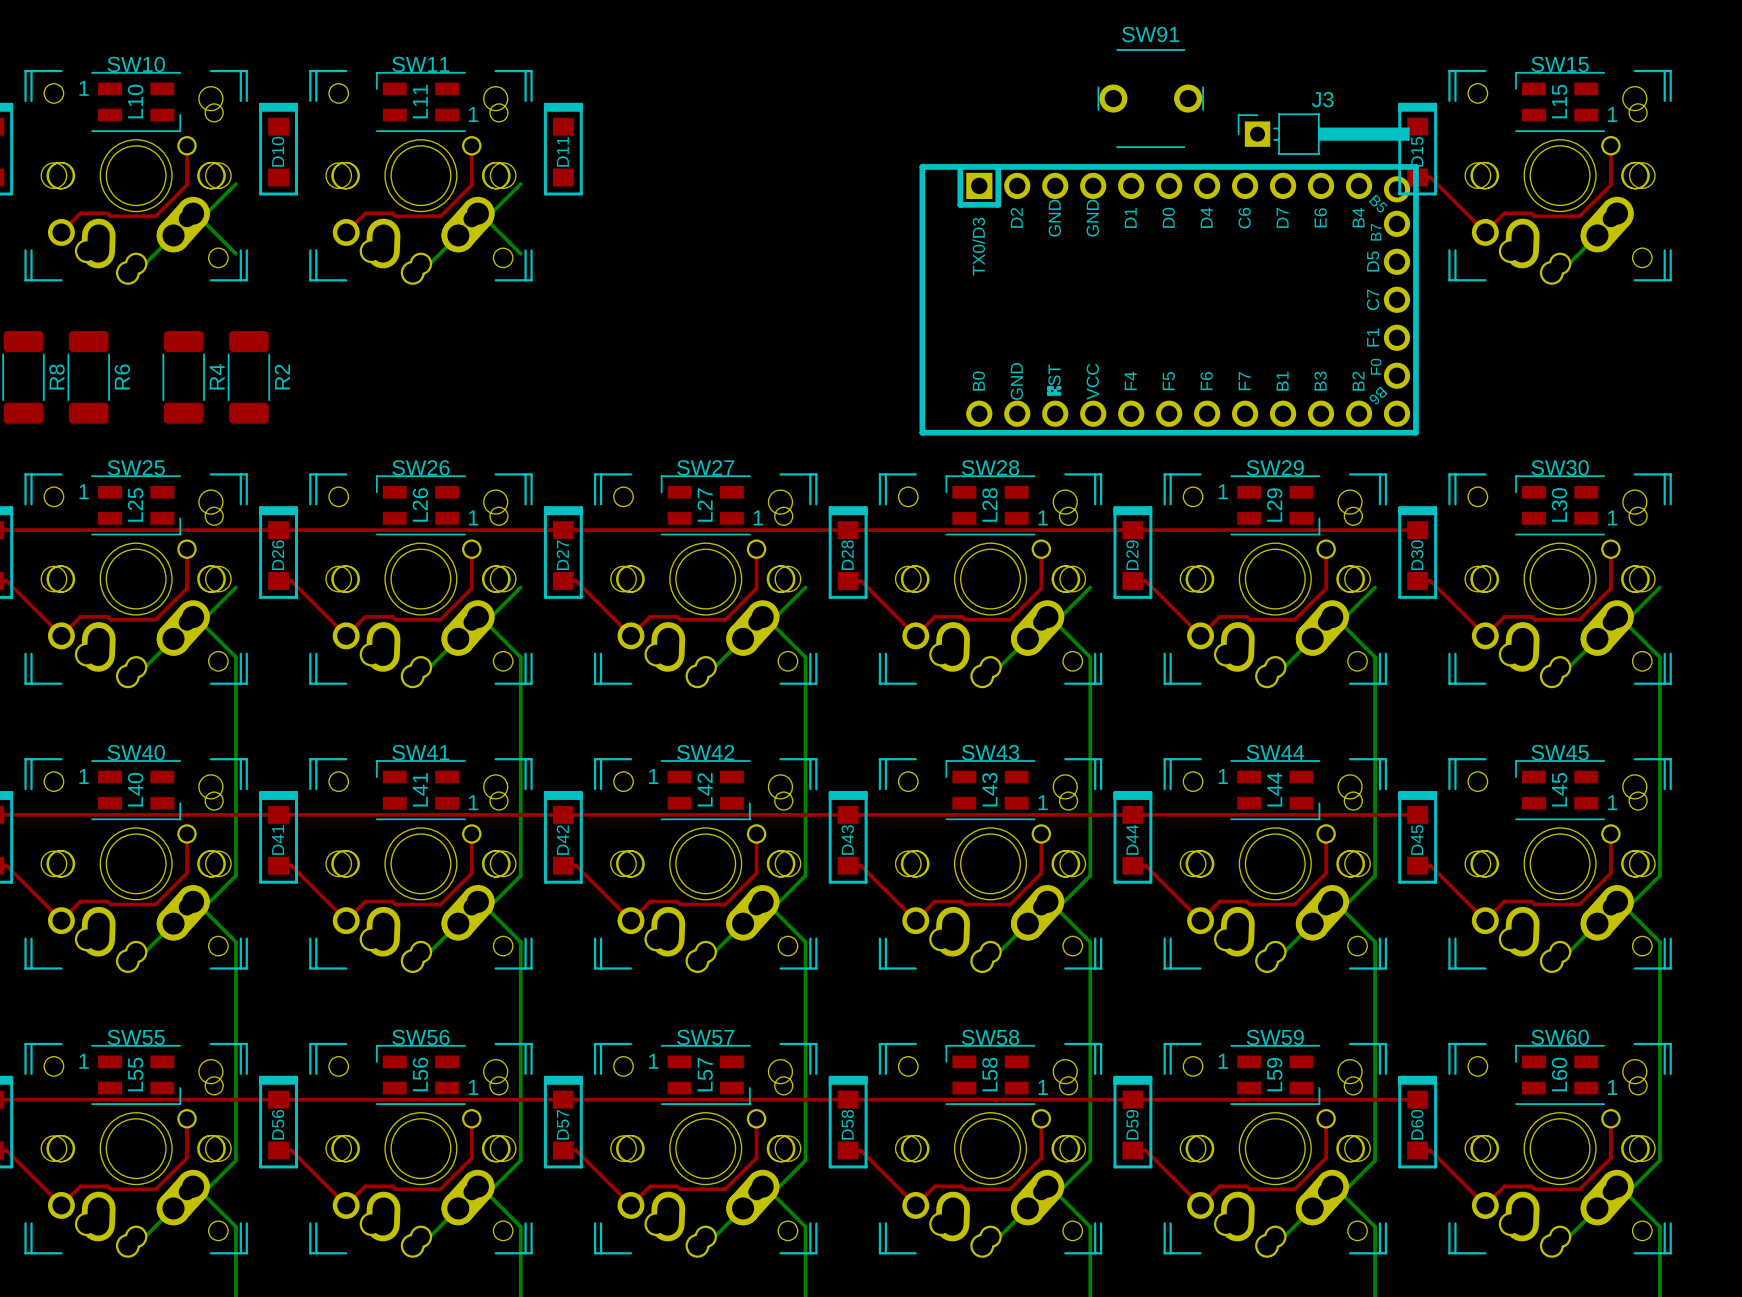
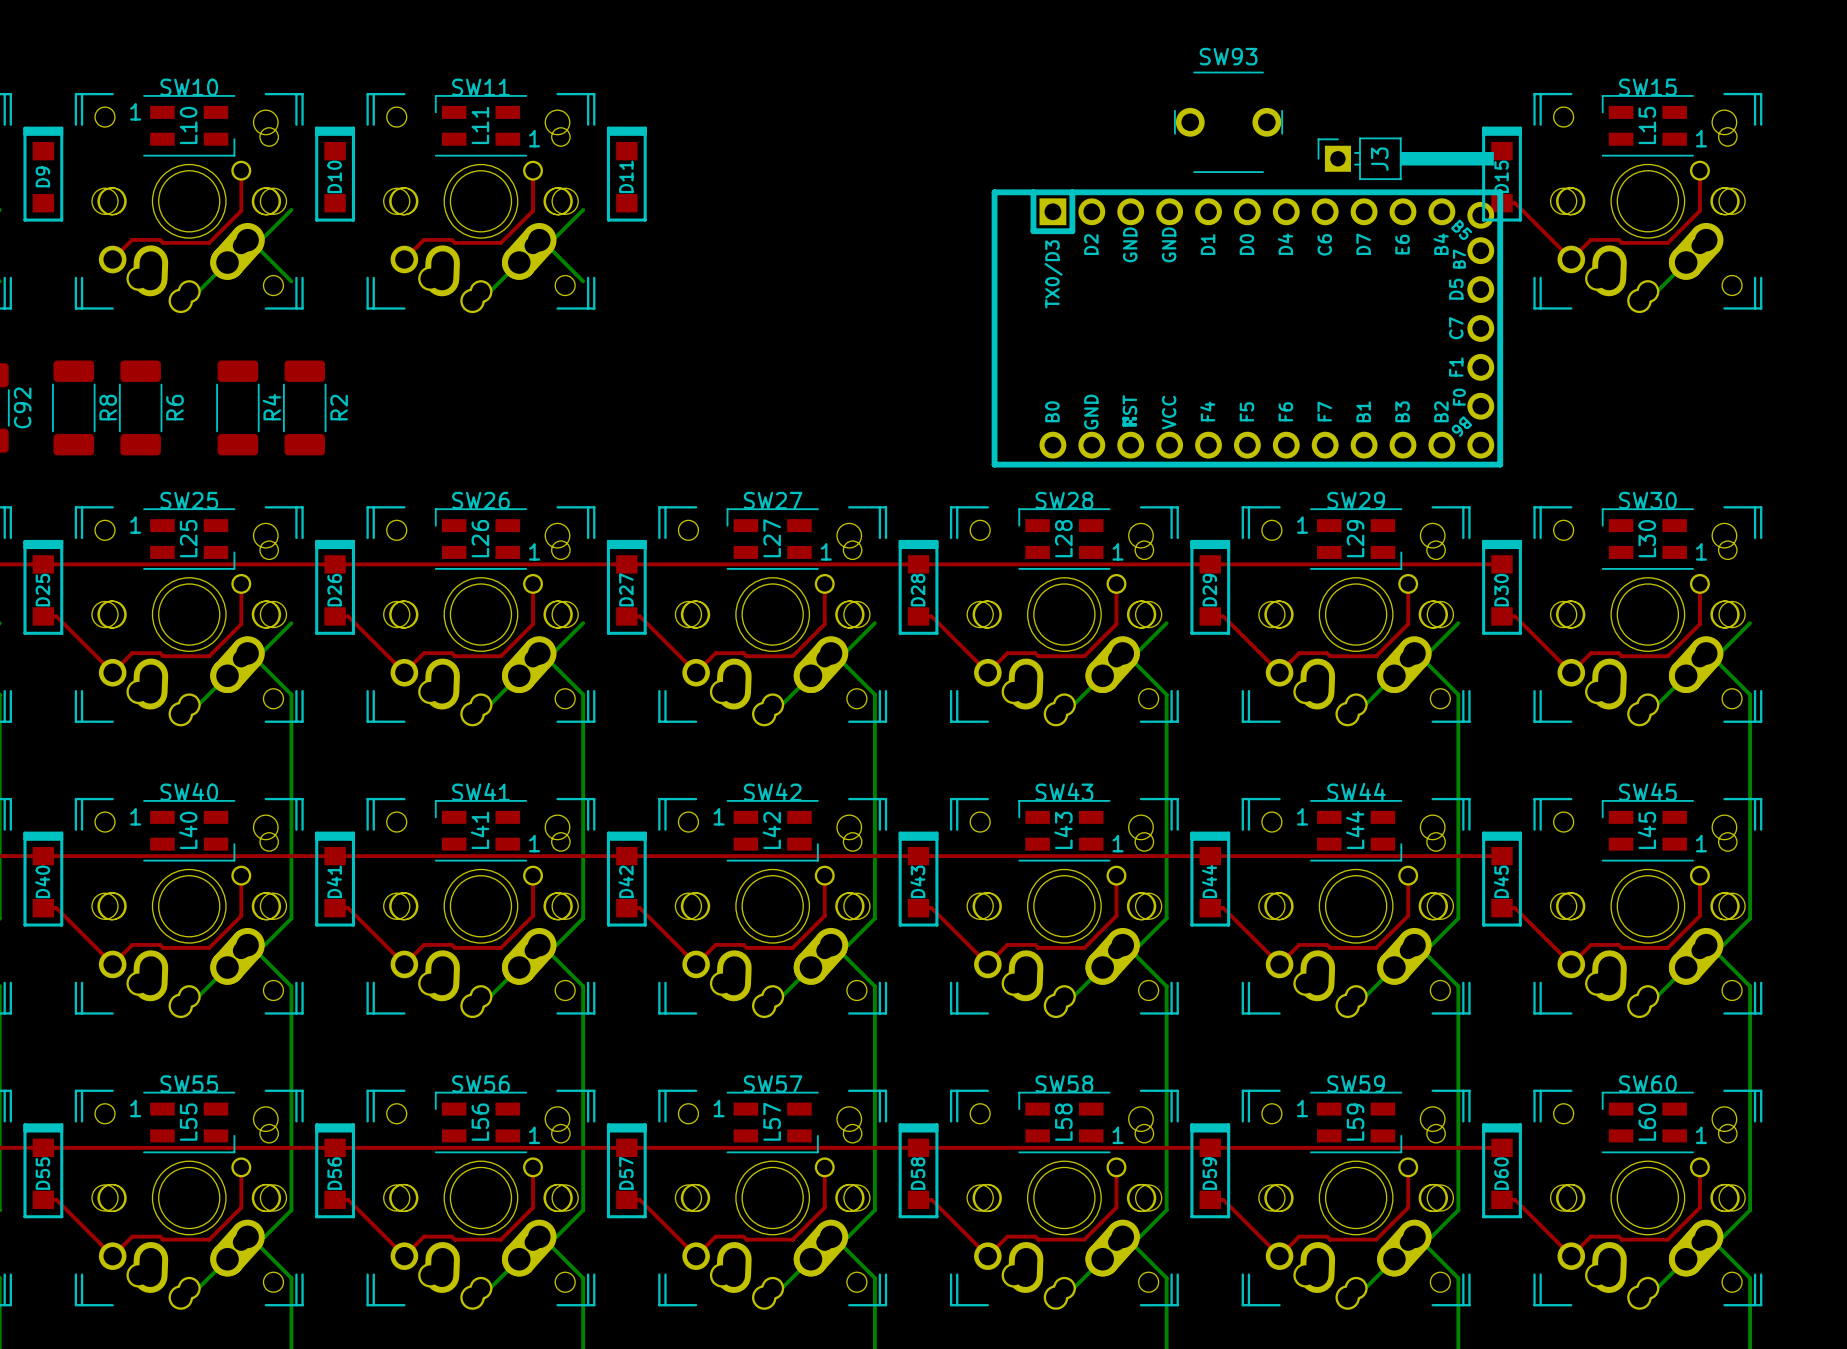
SW91 name: SW91 (1150, 34) -> SW93 (1228, 56)
J3 name rotation: 0° (1322, 99) -> 90° counterclockwise (1379, 159)
J3 name position: J3 (1322, 99) -> J3 (1379, 159)

